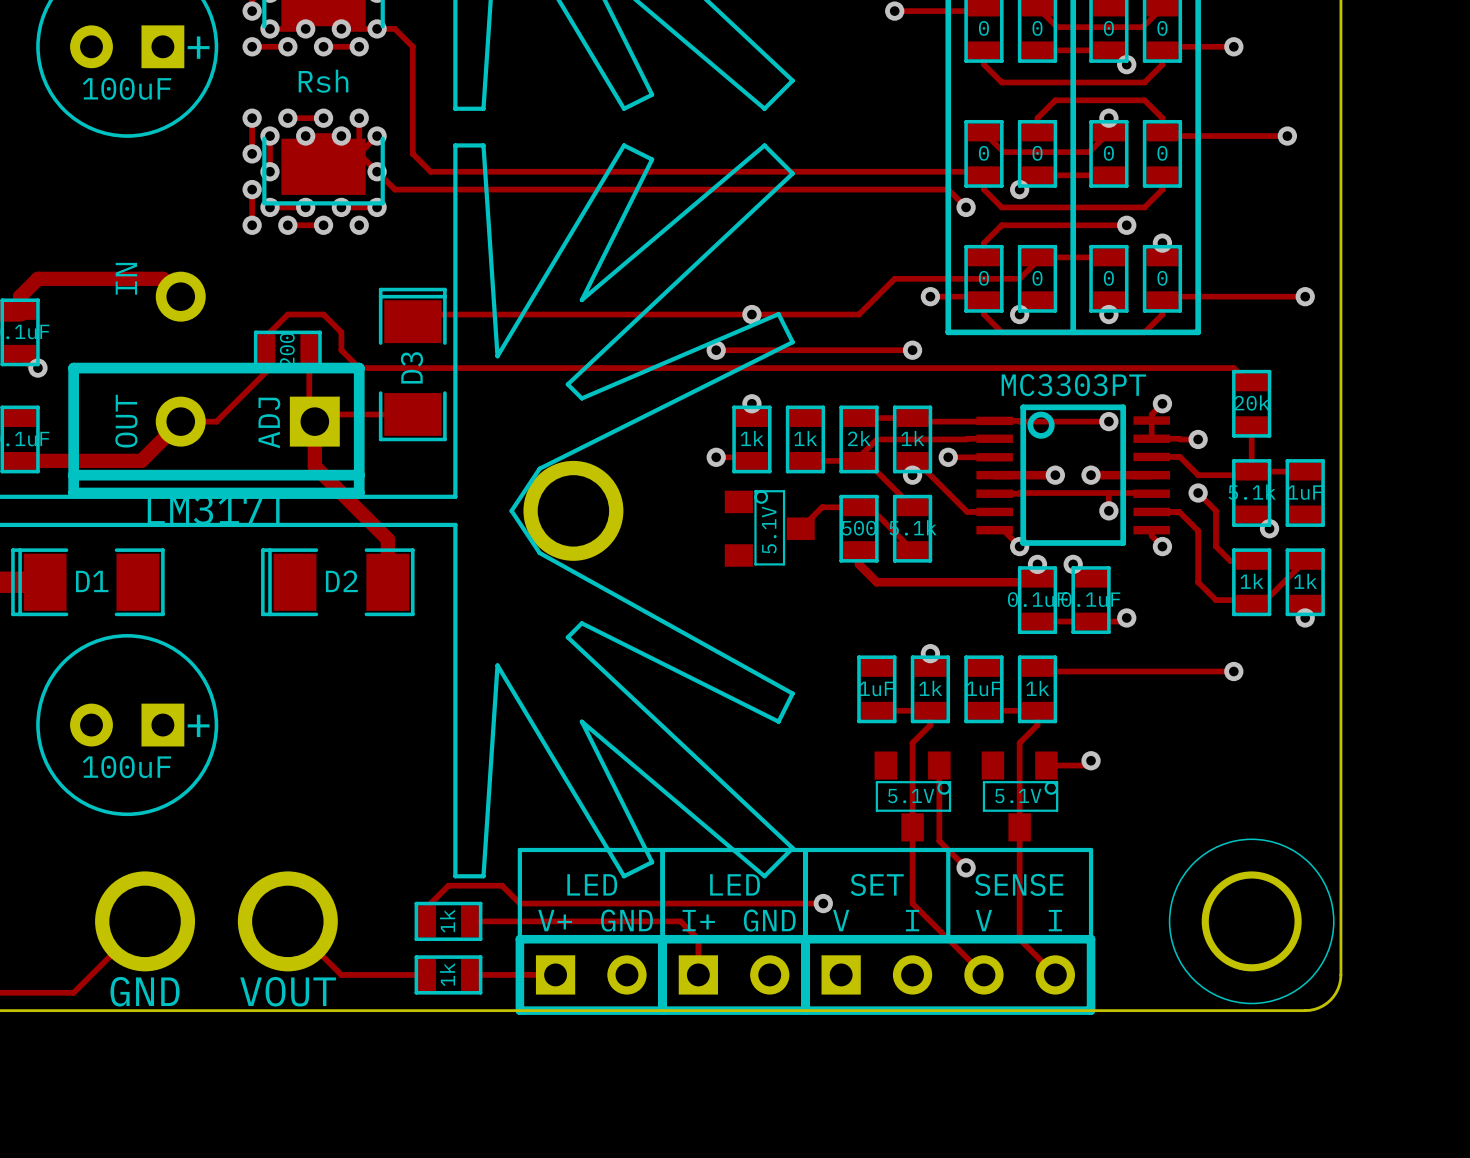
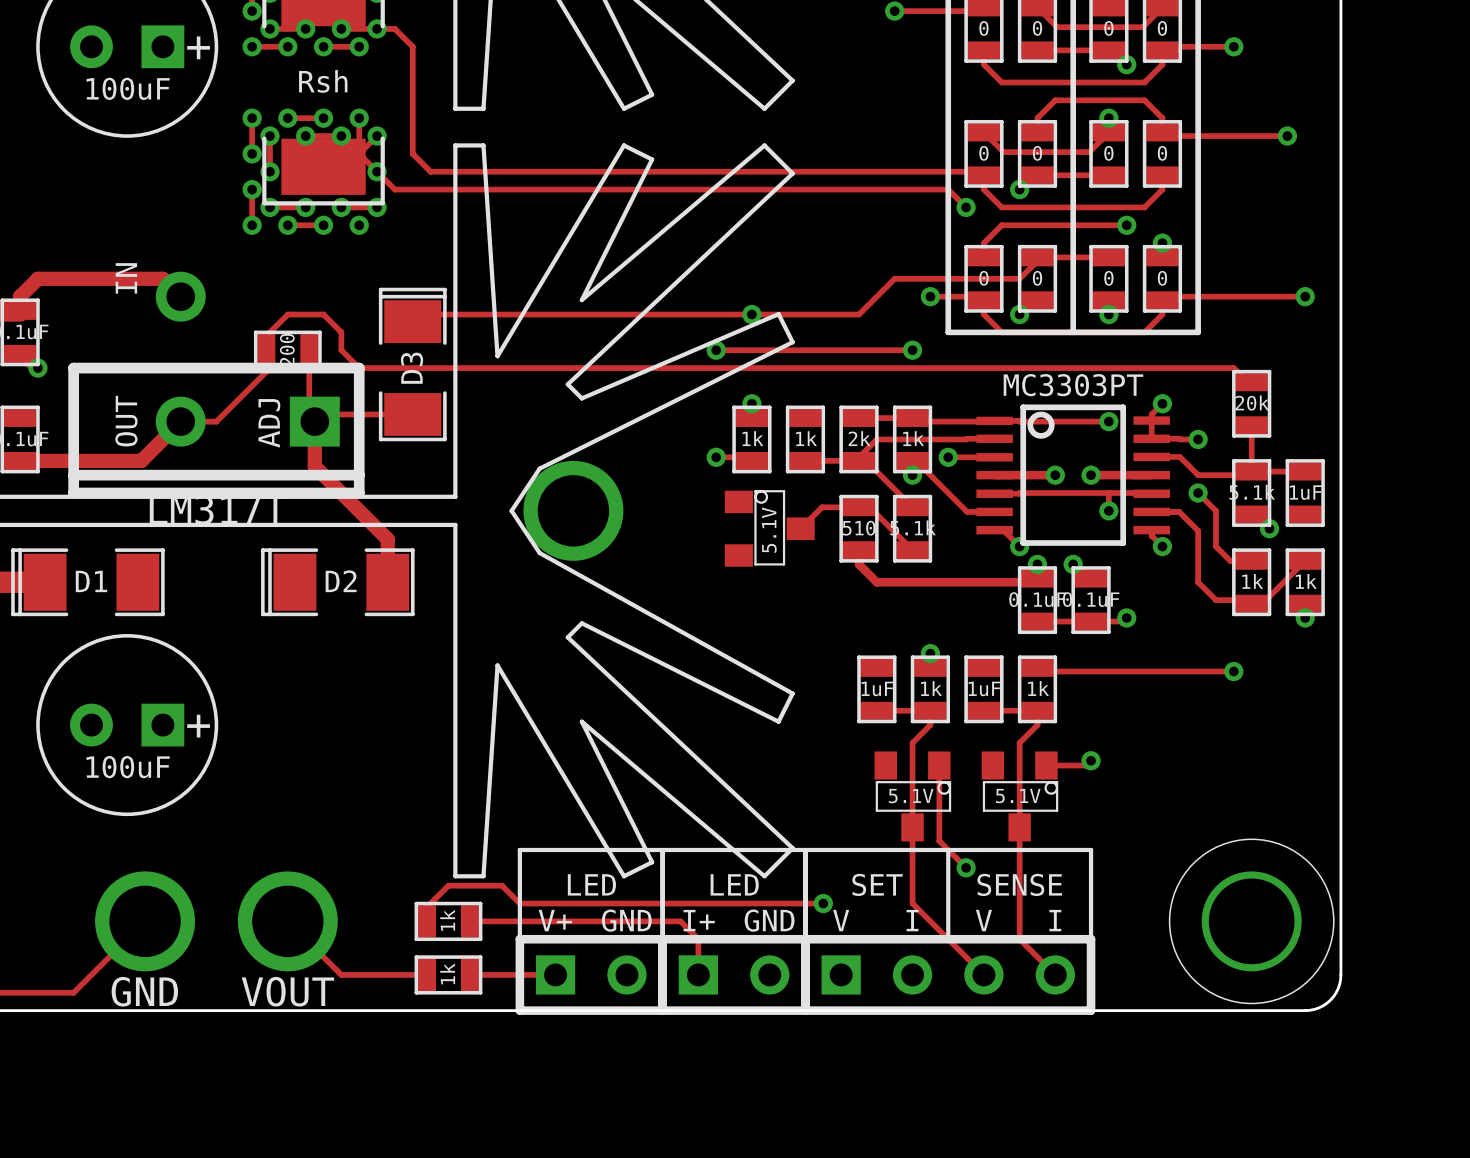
part value: 500 (859, 528) -> 510 (859, 528)

